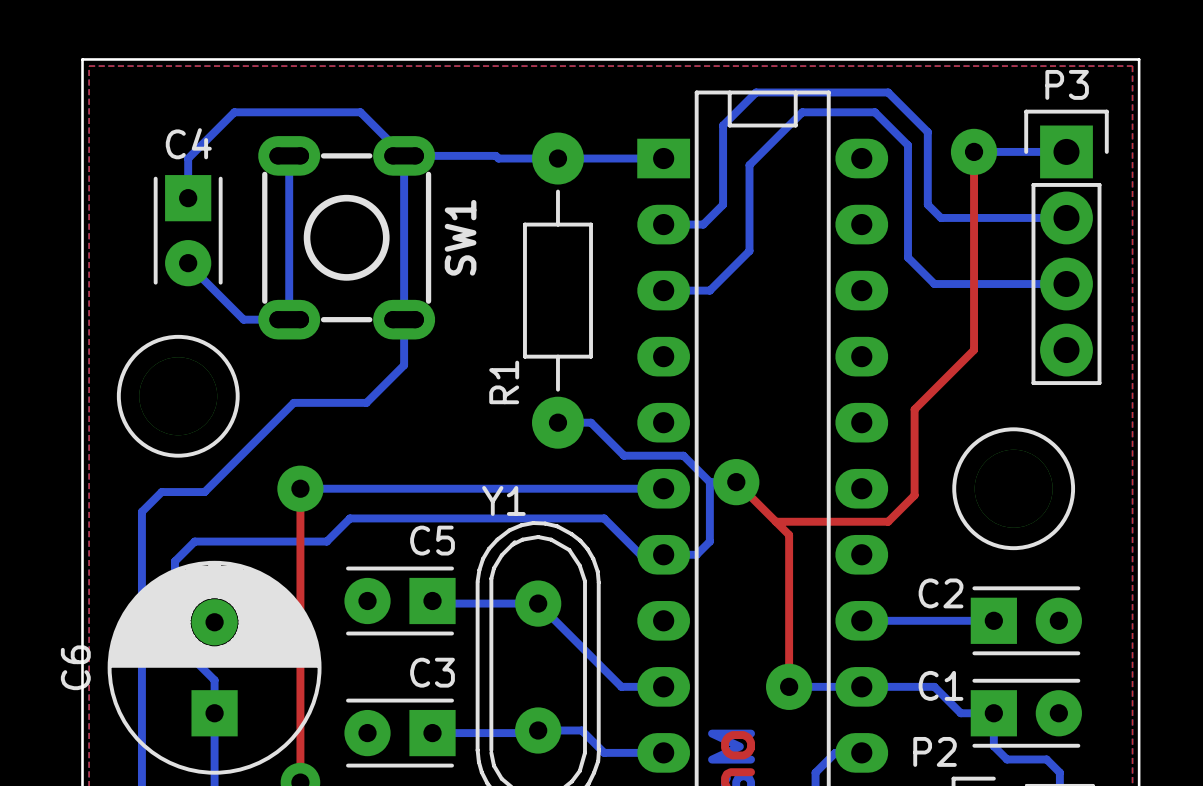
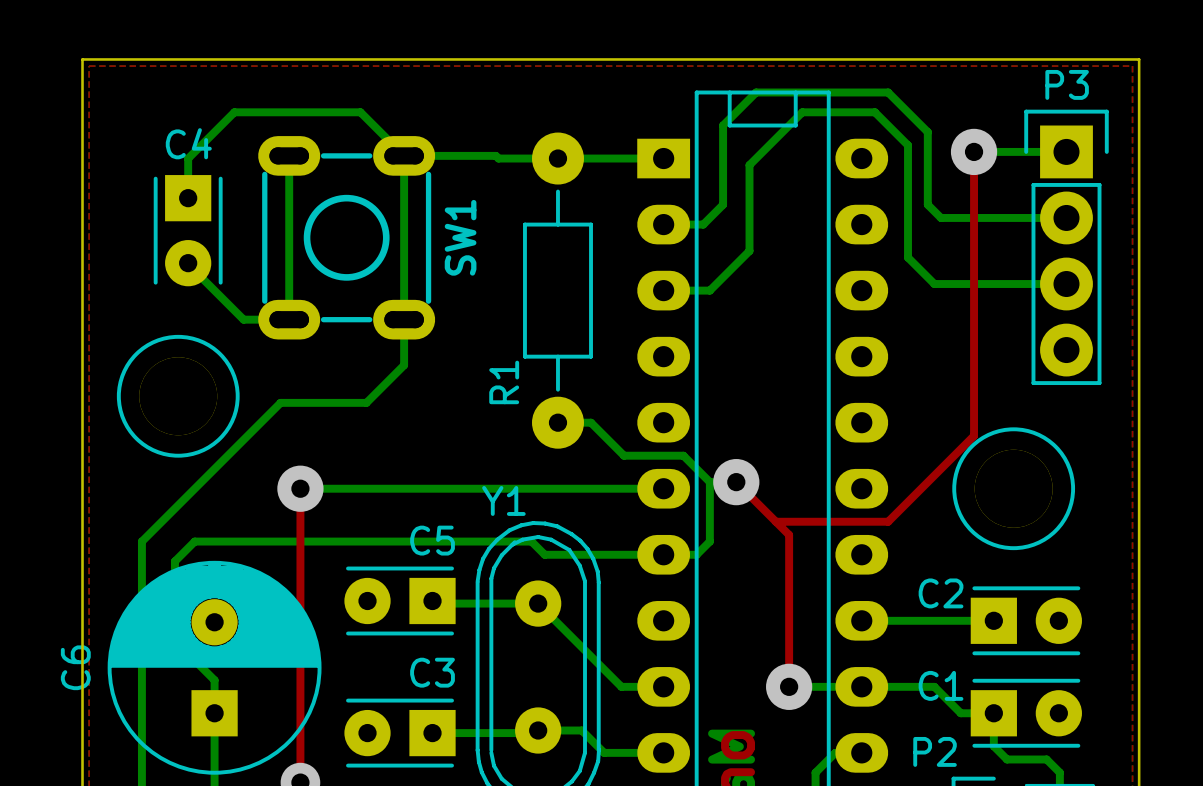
top track: (974, 350) (914, 409) (914, 495) -> (974, 350) (974, 435) (914, 495)
bottom track: (293, 402) (204, 492) (161, 492) (141, 511) (141, 541) -> (293, 402) (280, 402) (141, 541)
bottom track: (326, 541) (349, 518) (604, 518) (640, 554) -> (326, 541) (531, 541) (544, 554) (640, 554)

